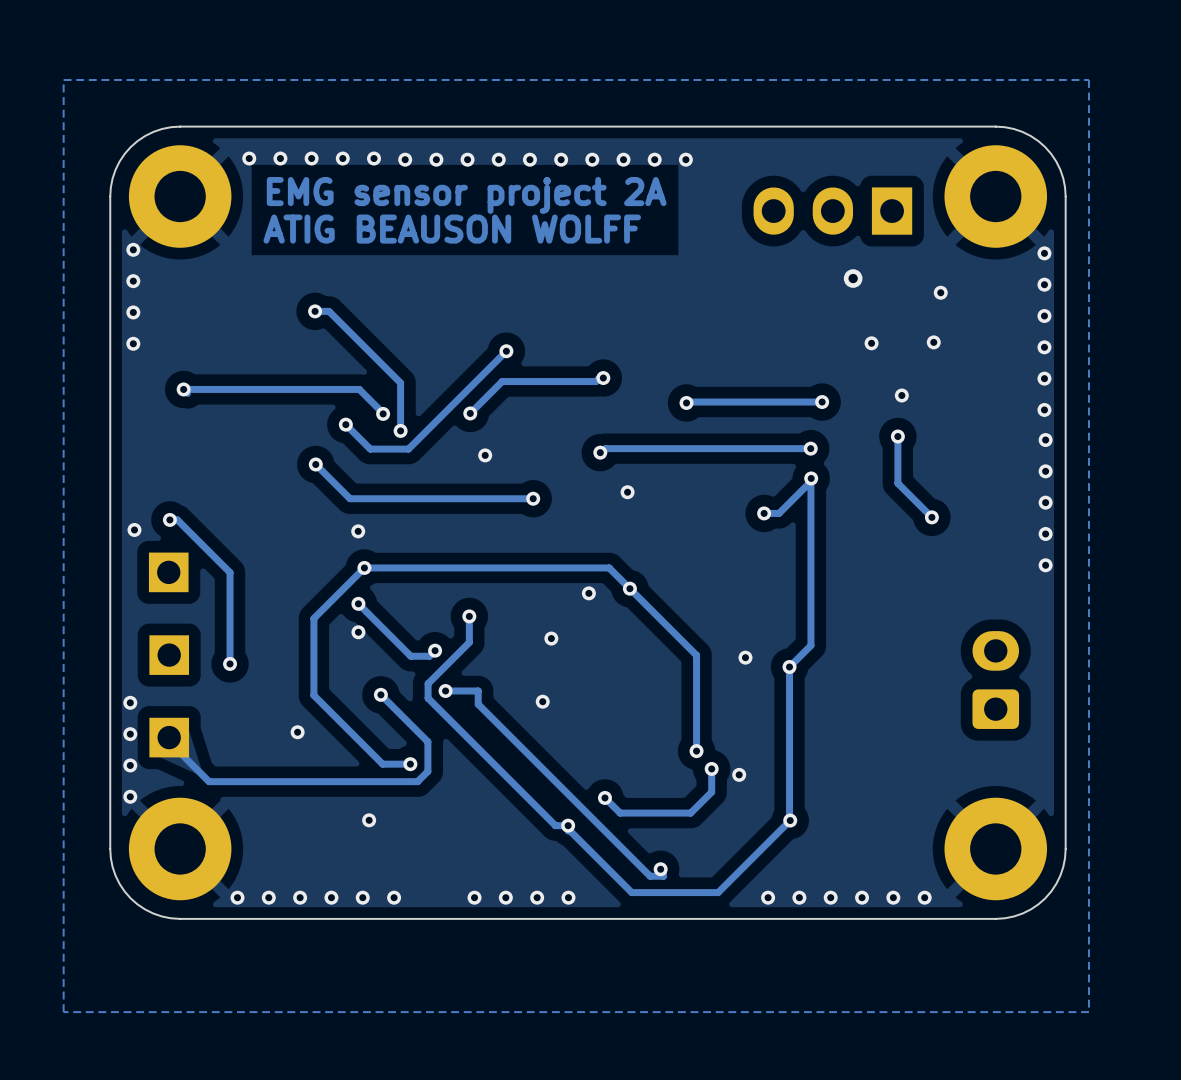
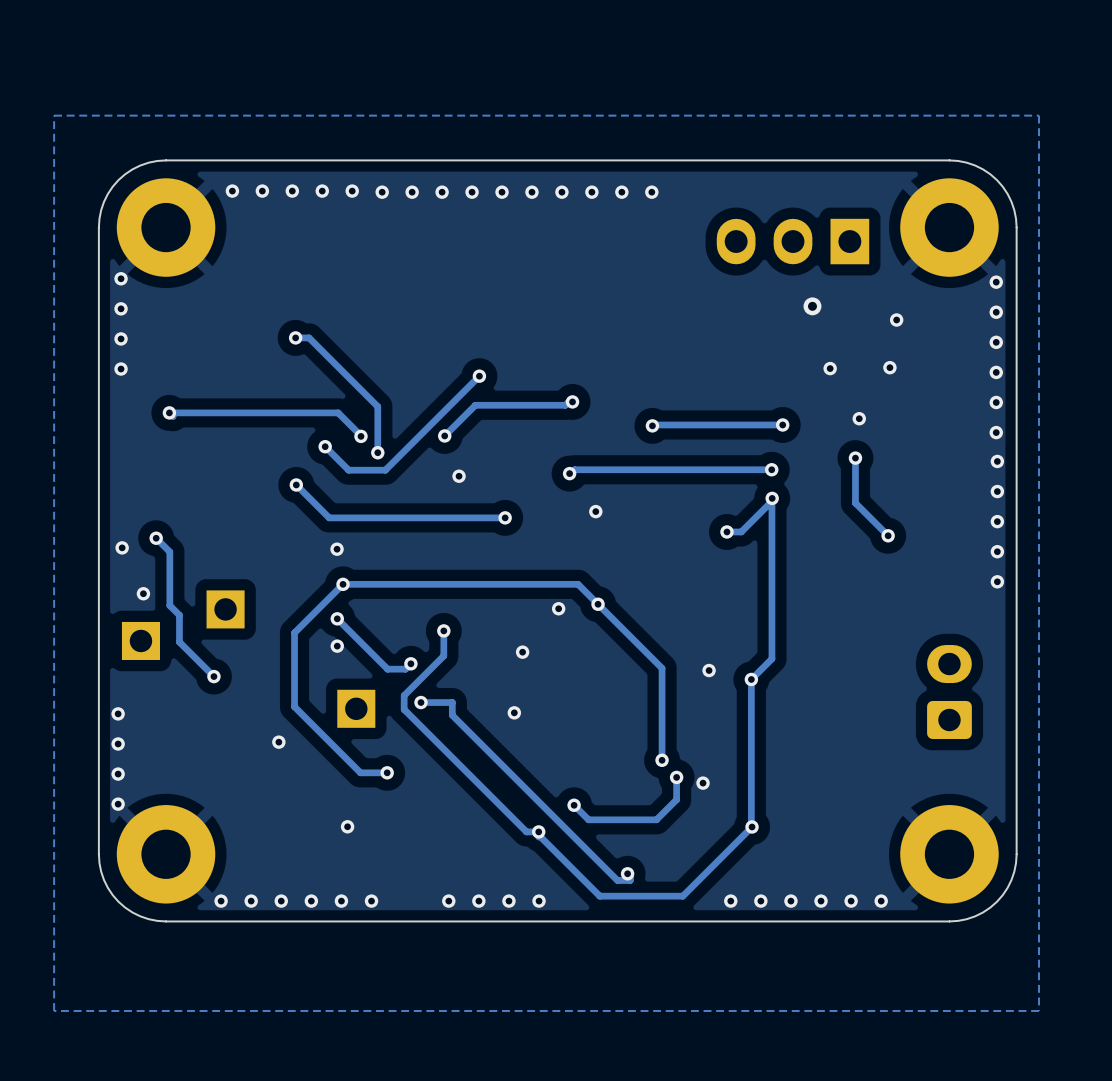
text: EMG sensor project 2A (466, 195) -> none
text: ATIG BEAUSON WOLFF (452, 229) -> none
track: (169, 519) (177, 519) (230, 572) (230, 663) -> (156, 538) (169, 551) (169, 605) (179, 615) (179, 642) (213, 676)
part: (168, 572) -> none
via: none -> (143, 593)
part: none -> (225, 609)
part: none -> (140, 640)
part: (169, 655) -> none
track: (380, 694) (427, 741) (427, 771) (417, 781) (209, 781) (168, 741) -> none
via: (380, 694) -> none
part: none -> (356, 708)
part: (169, 737) -> none

